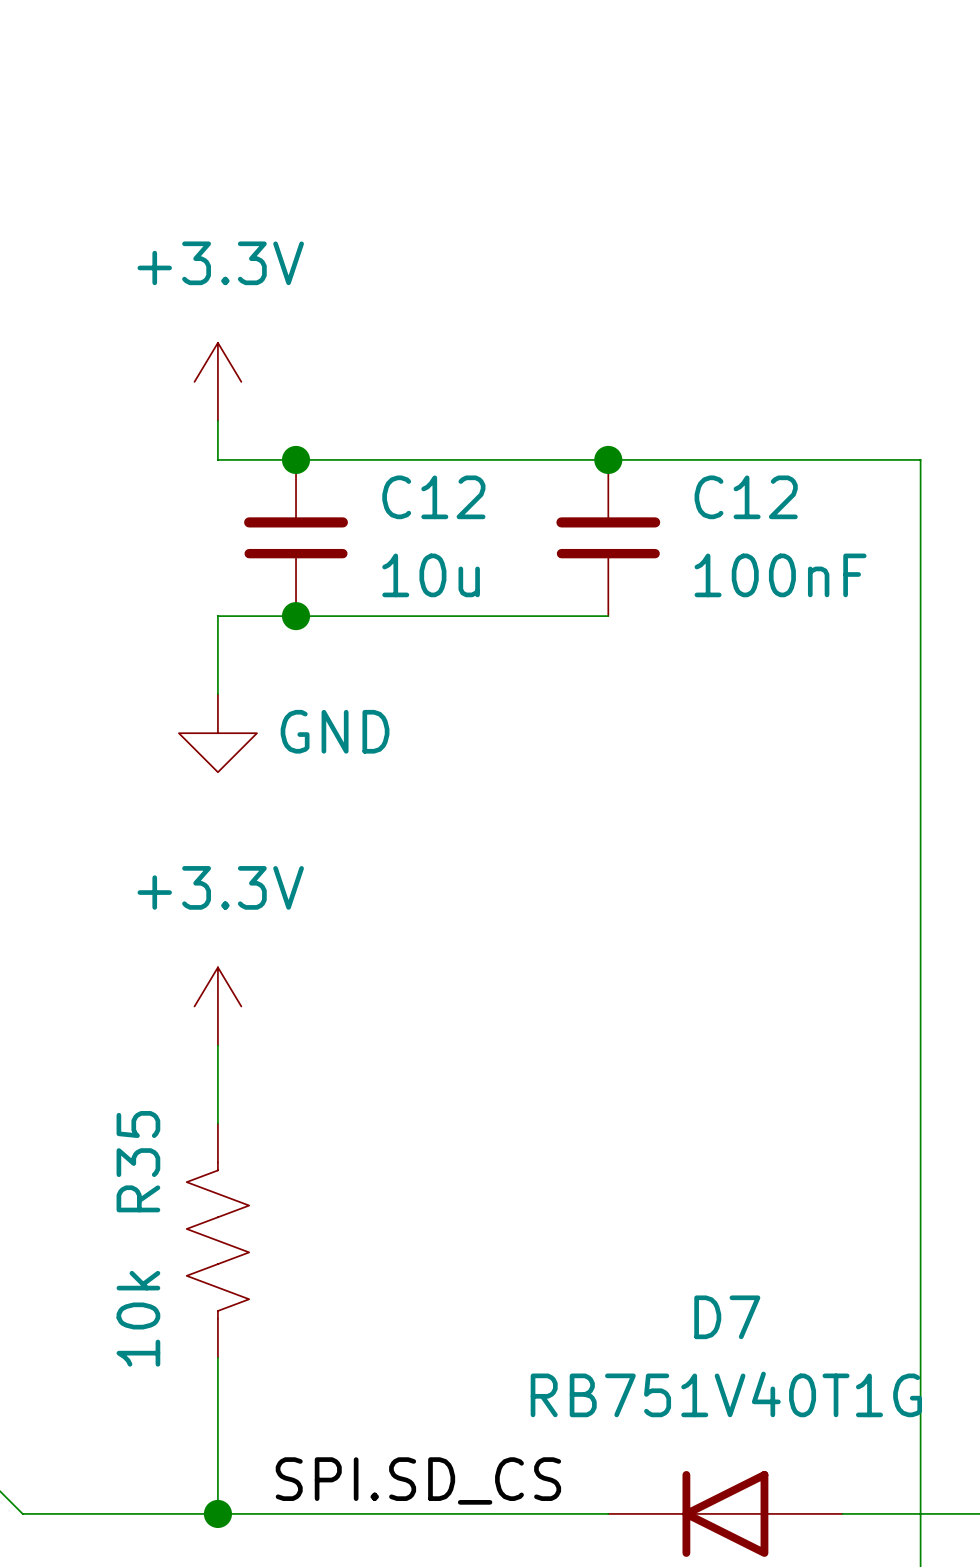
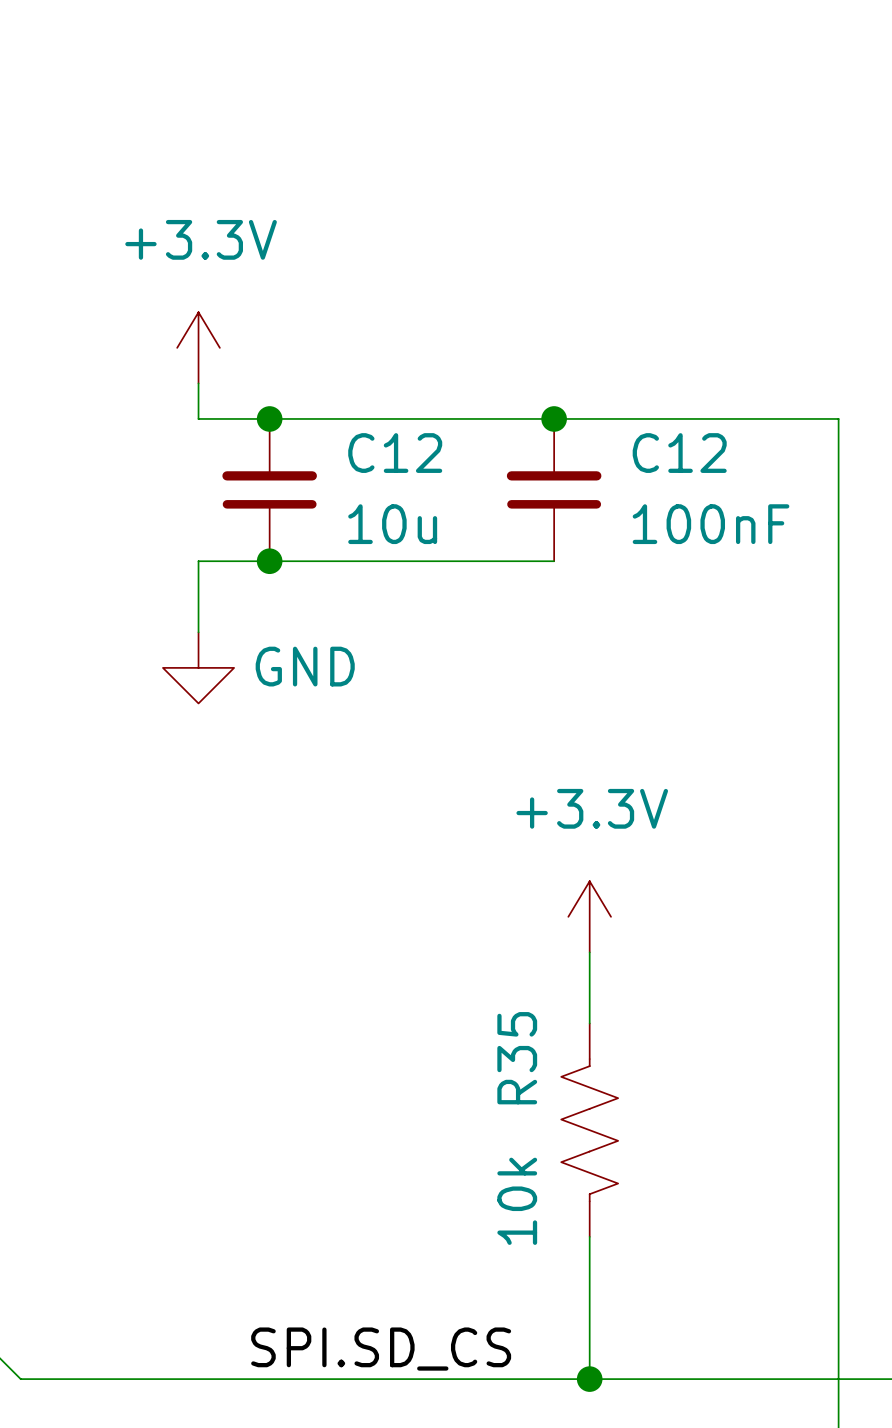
power symbol position: +3.3V (217, 1006) -> +3.3V (589, 916)
wire: (217, 1045) (217, 1123) -> (589, 952) (589, 1023)
R35 position: (217, 1240) -> (589, 1130)
wire: (217, 1357) (217, 1513) -> (589, 1236) (589, 1379)
junction: (217, 1513) -> none
junction: none -> (589, 1379)
D7: RB751V40T1G (725, 1513) -> none

